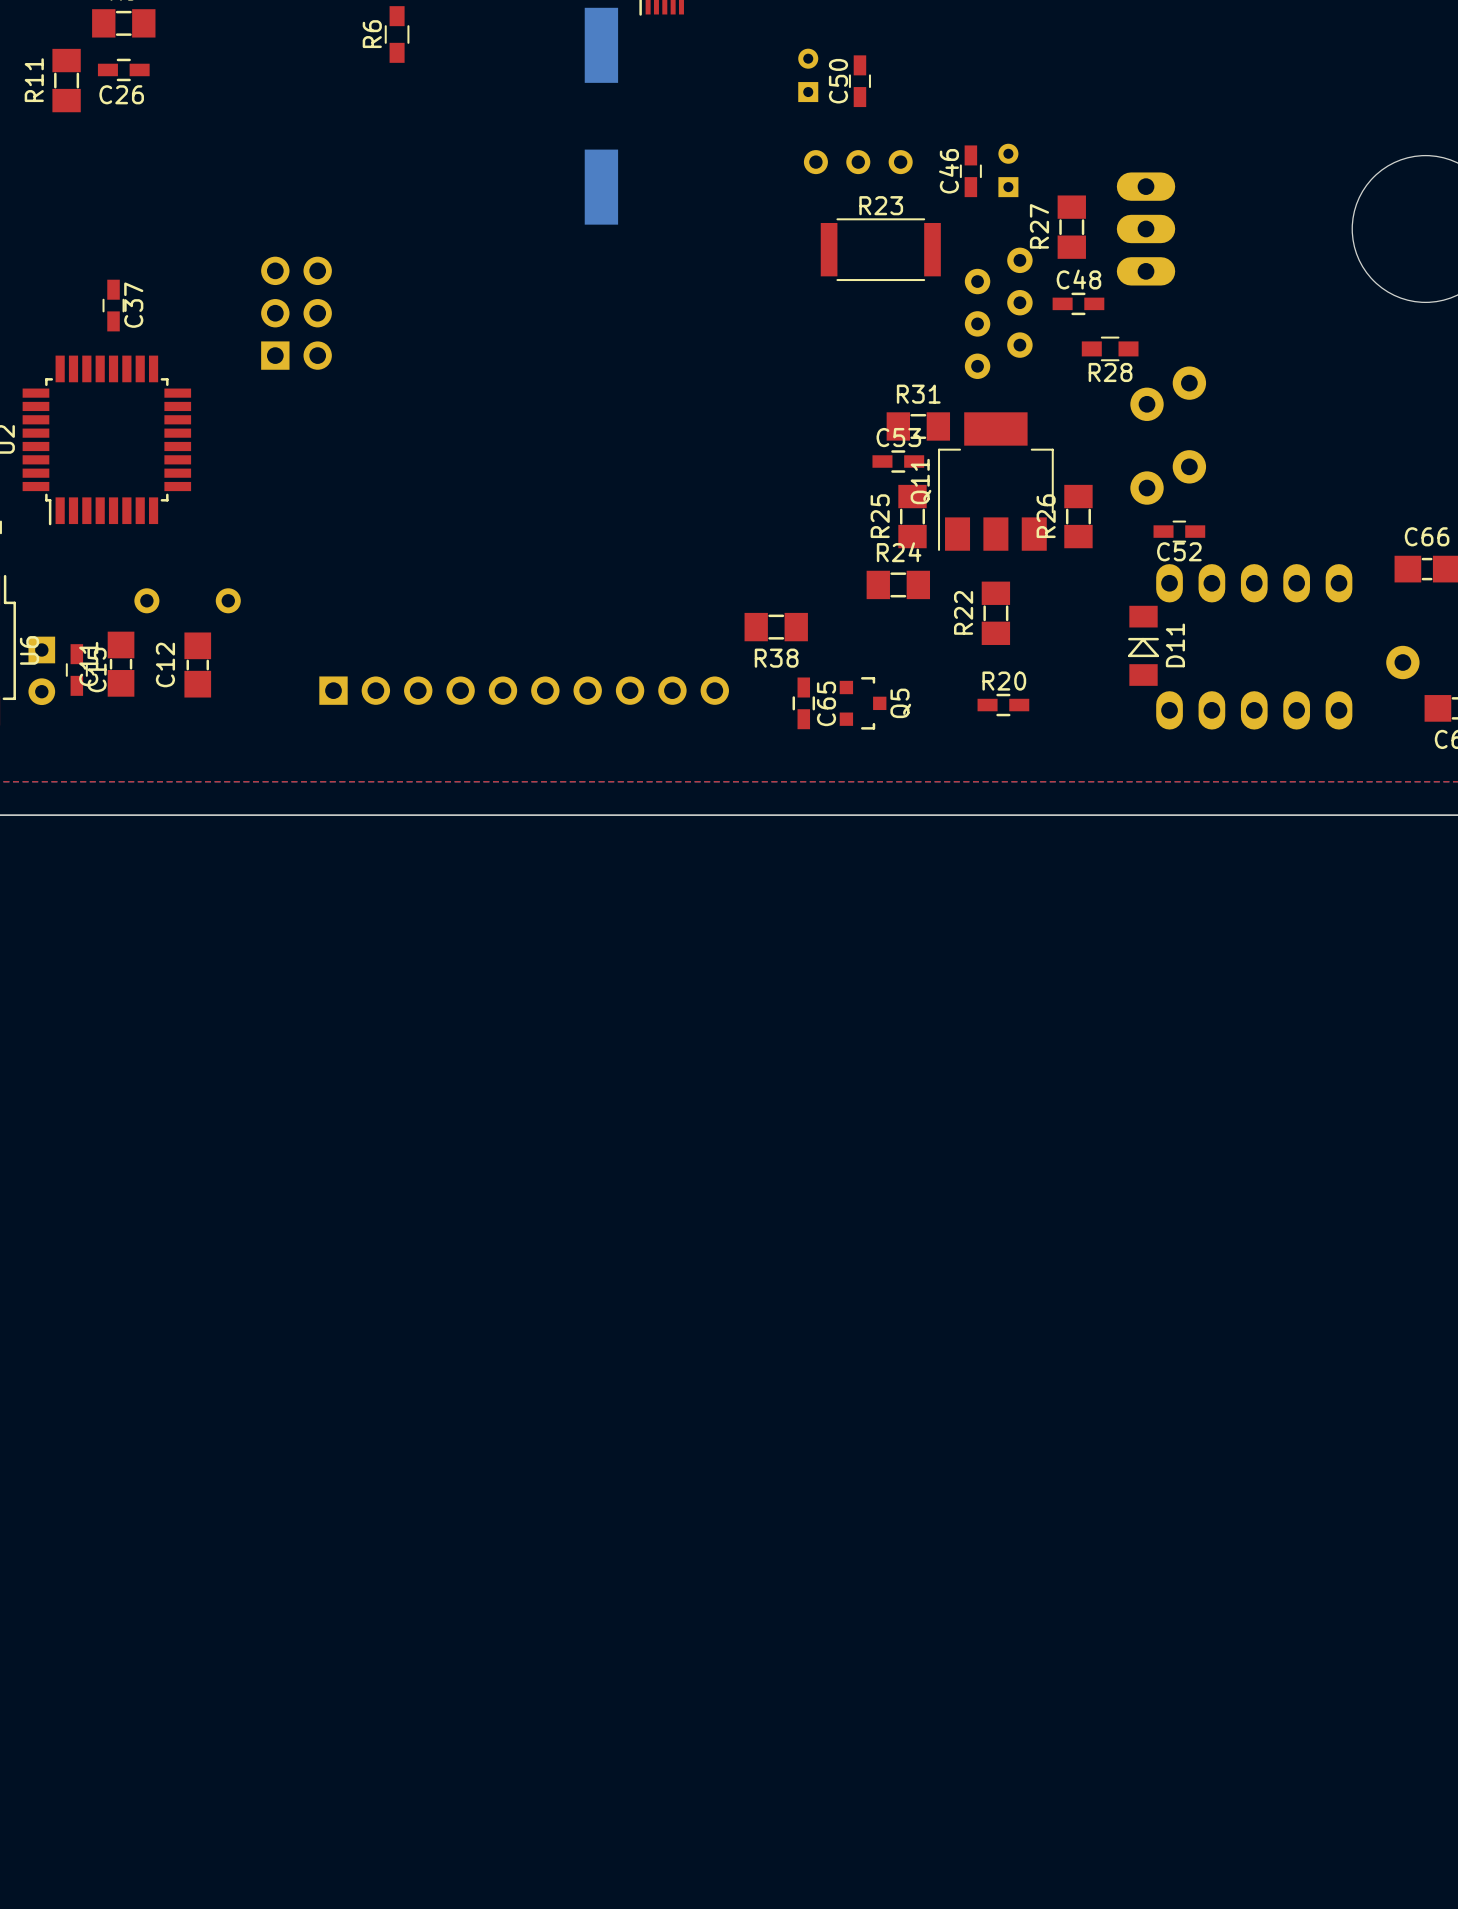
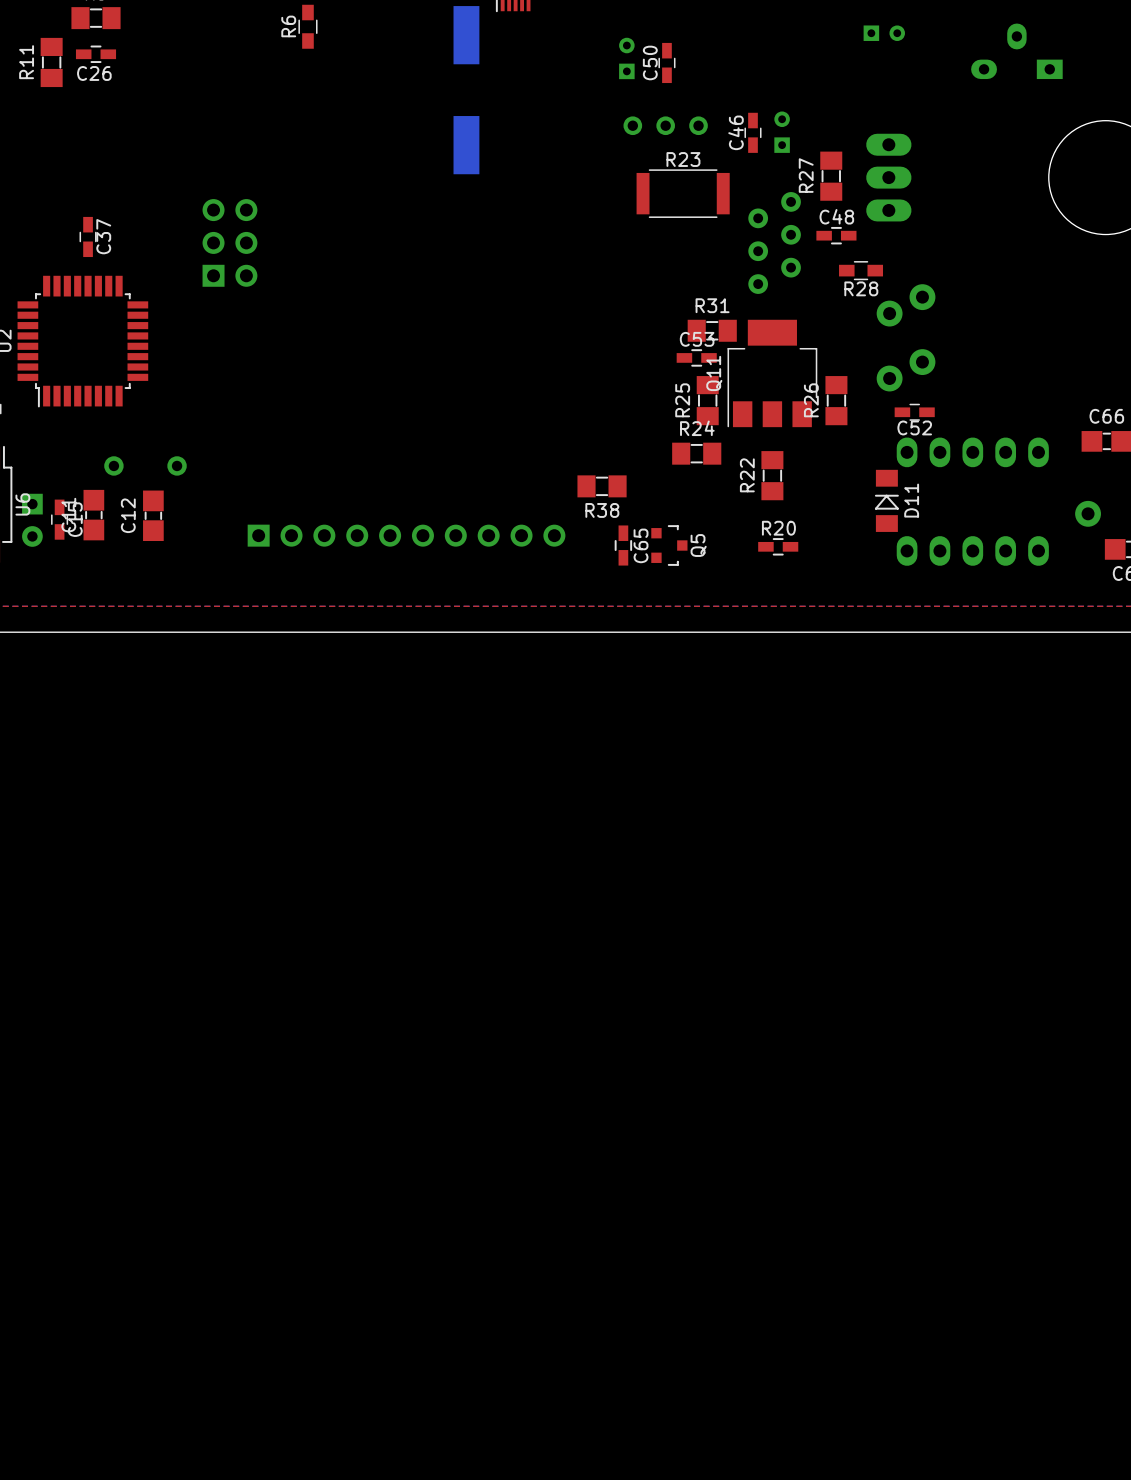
part: none -> (884, 33)
part: none -> (1016, 51)

